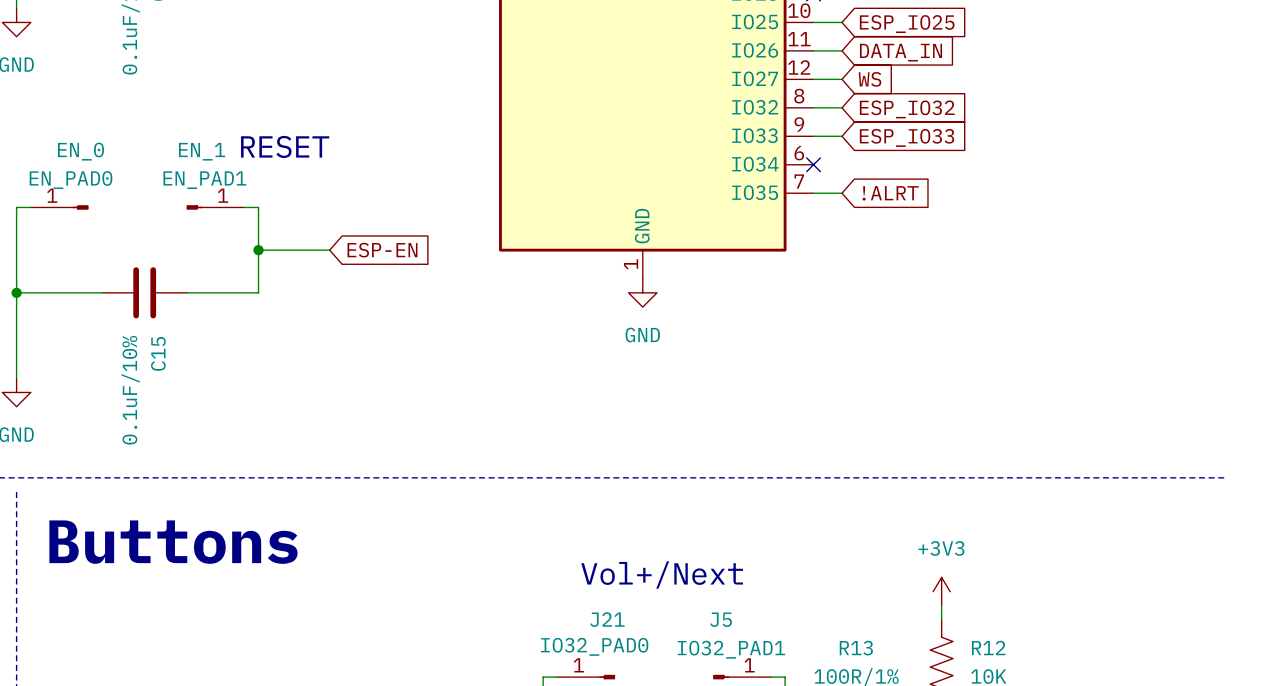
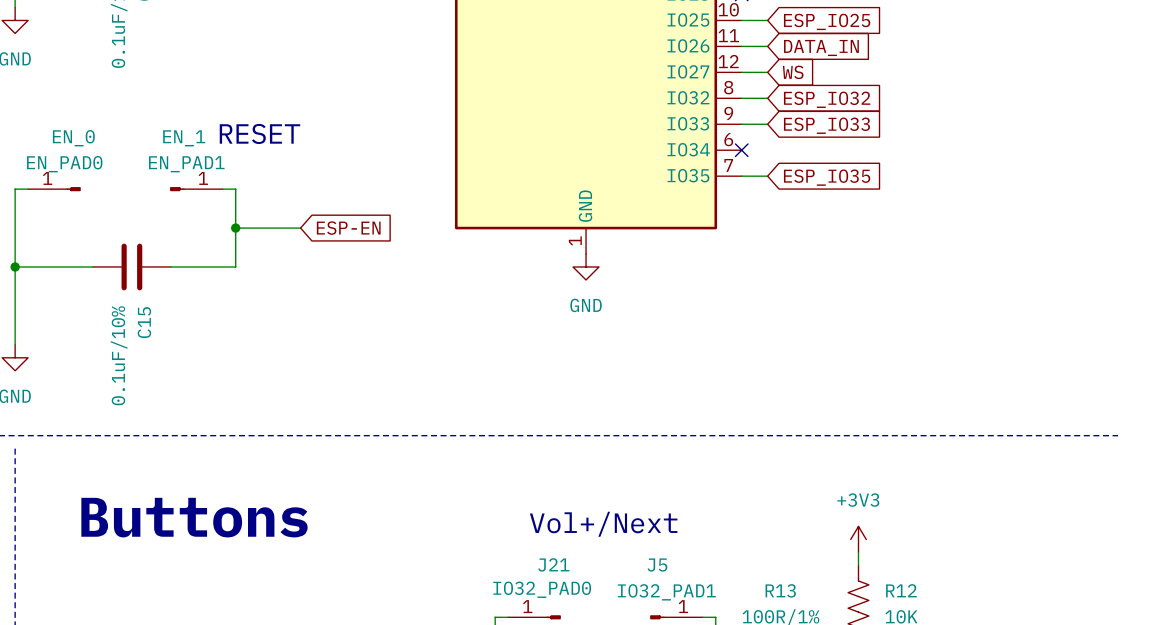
global label: !ALRT (890, 193) -> ESP_IO35 (827, 177)
text position: Buttons (173, 542) -> Buttons (194, 517)

